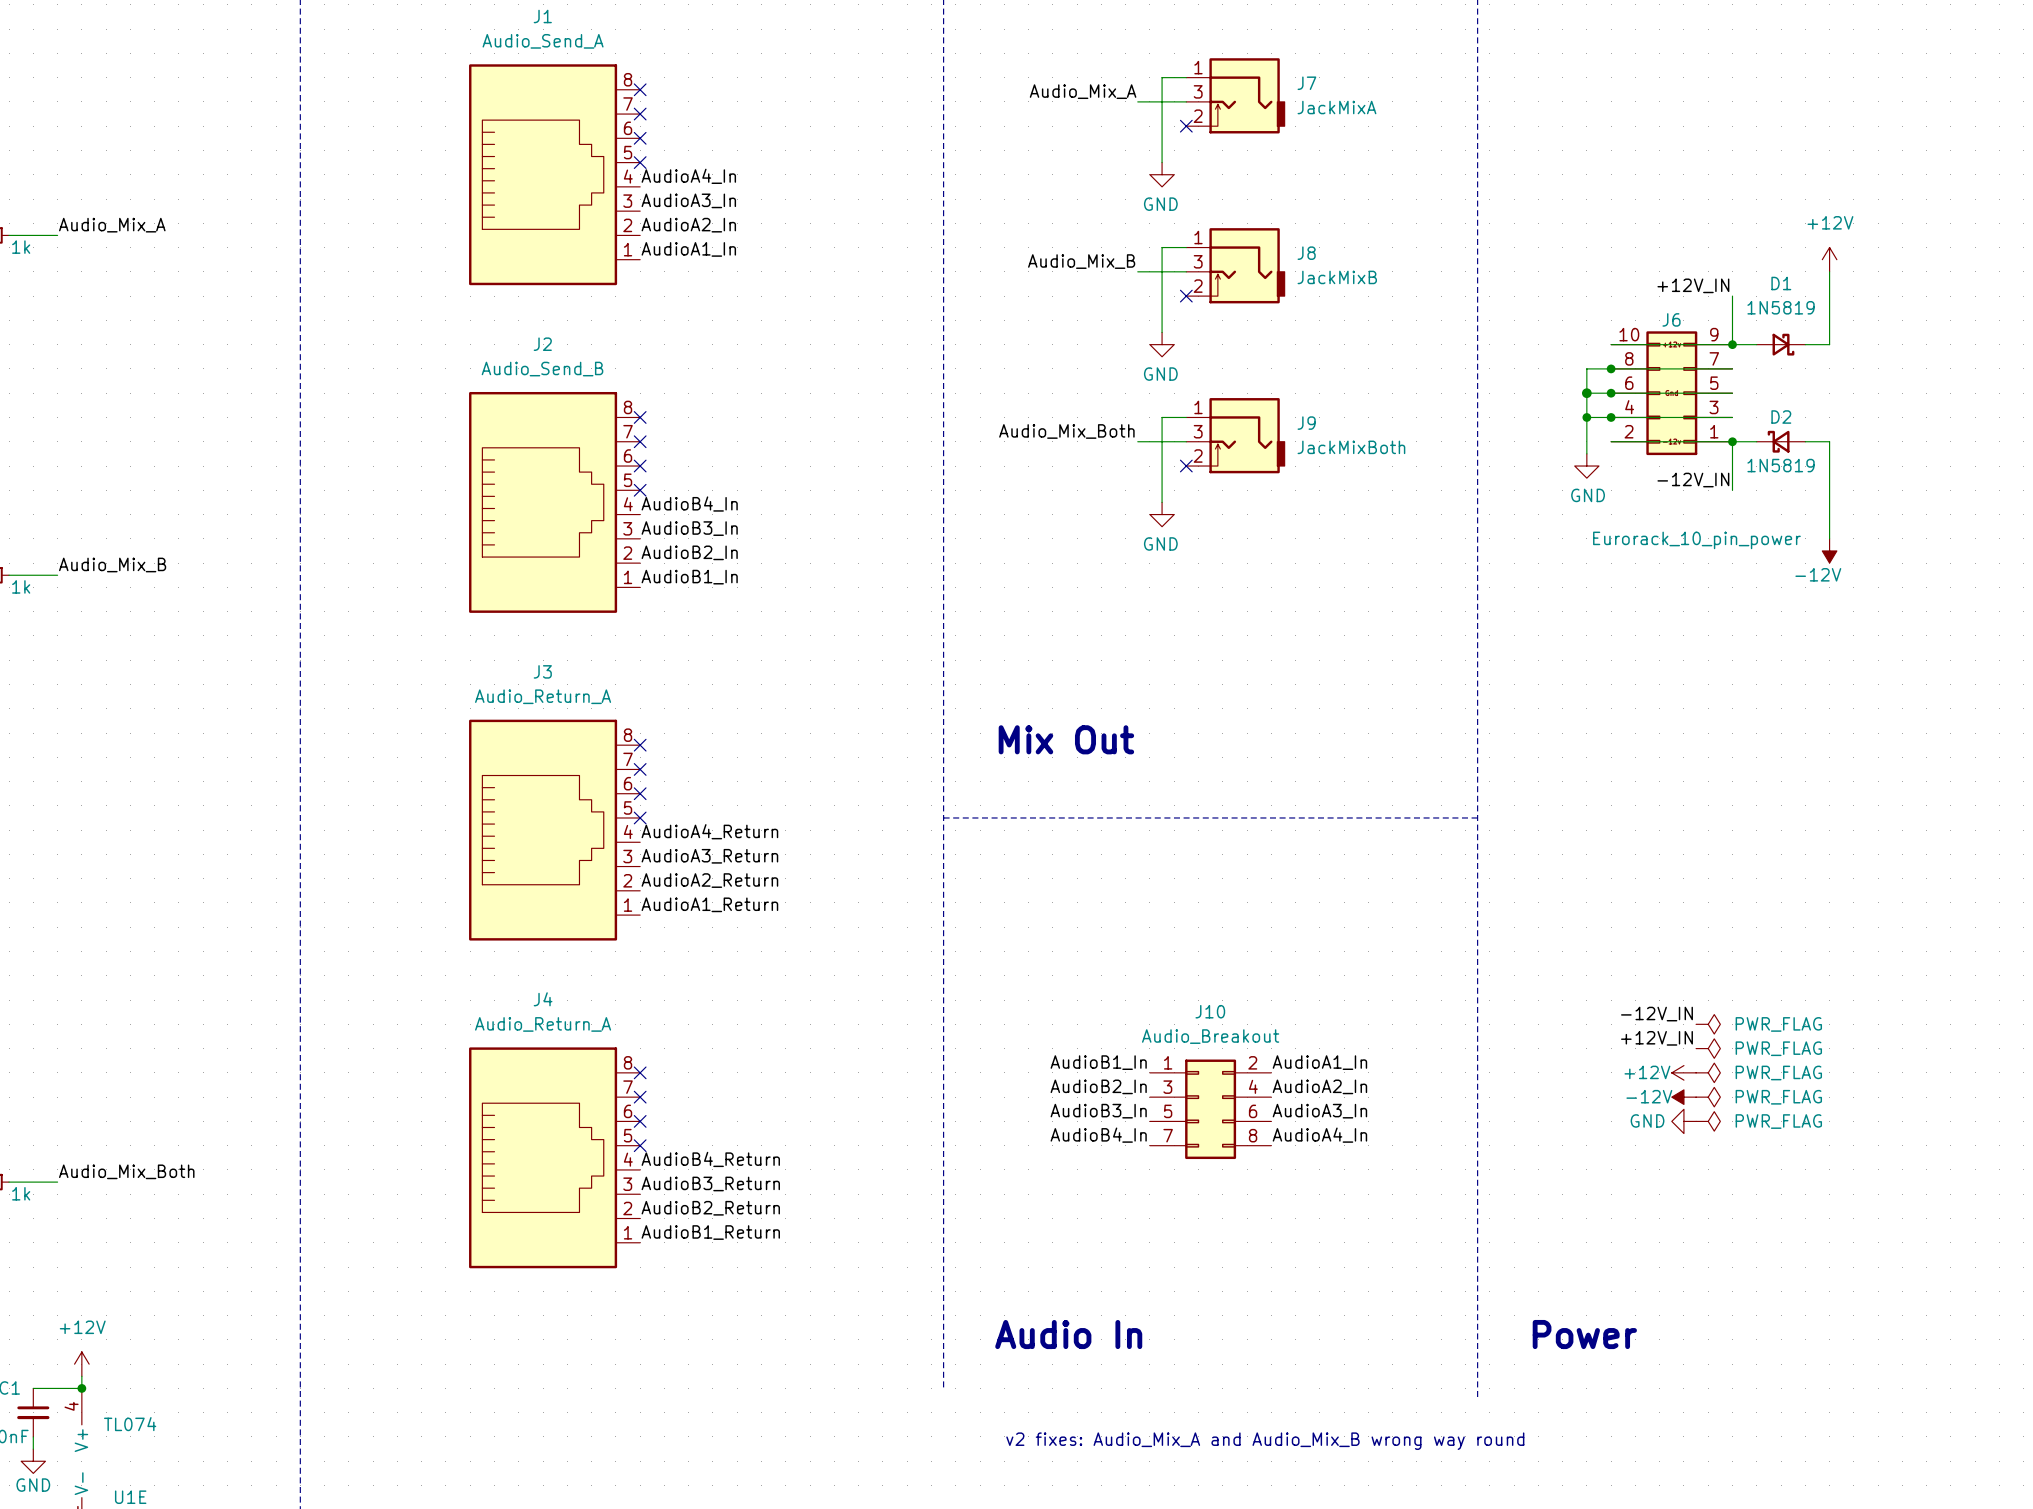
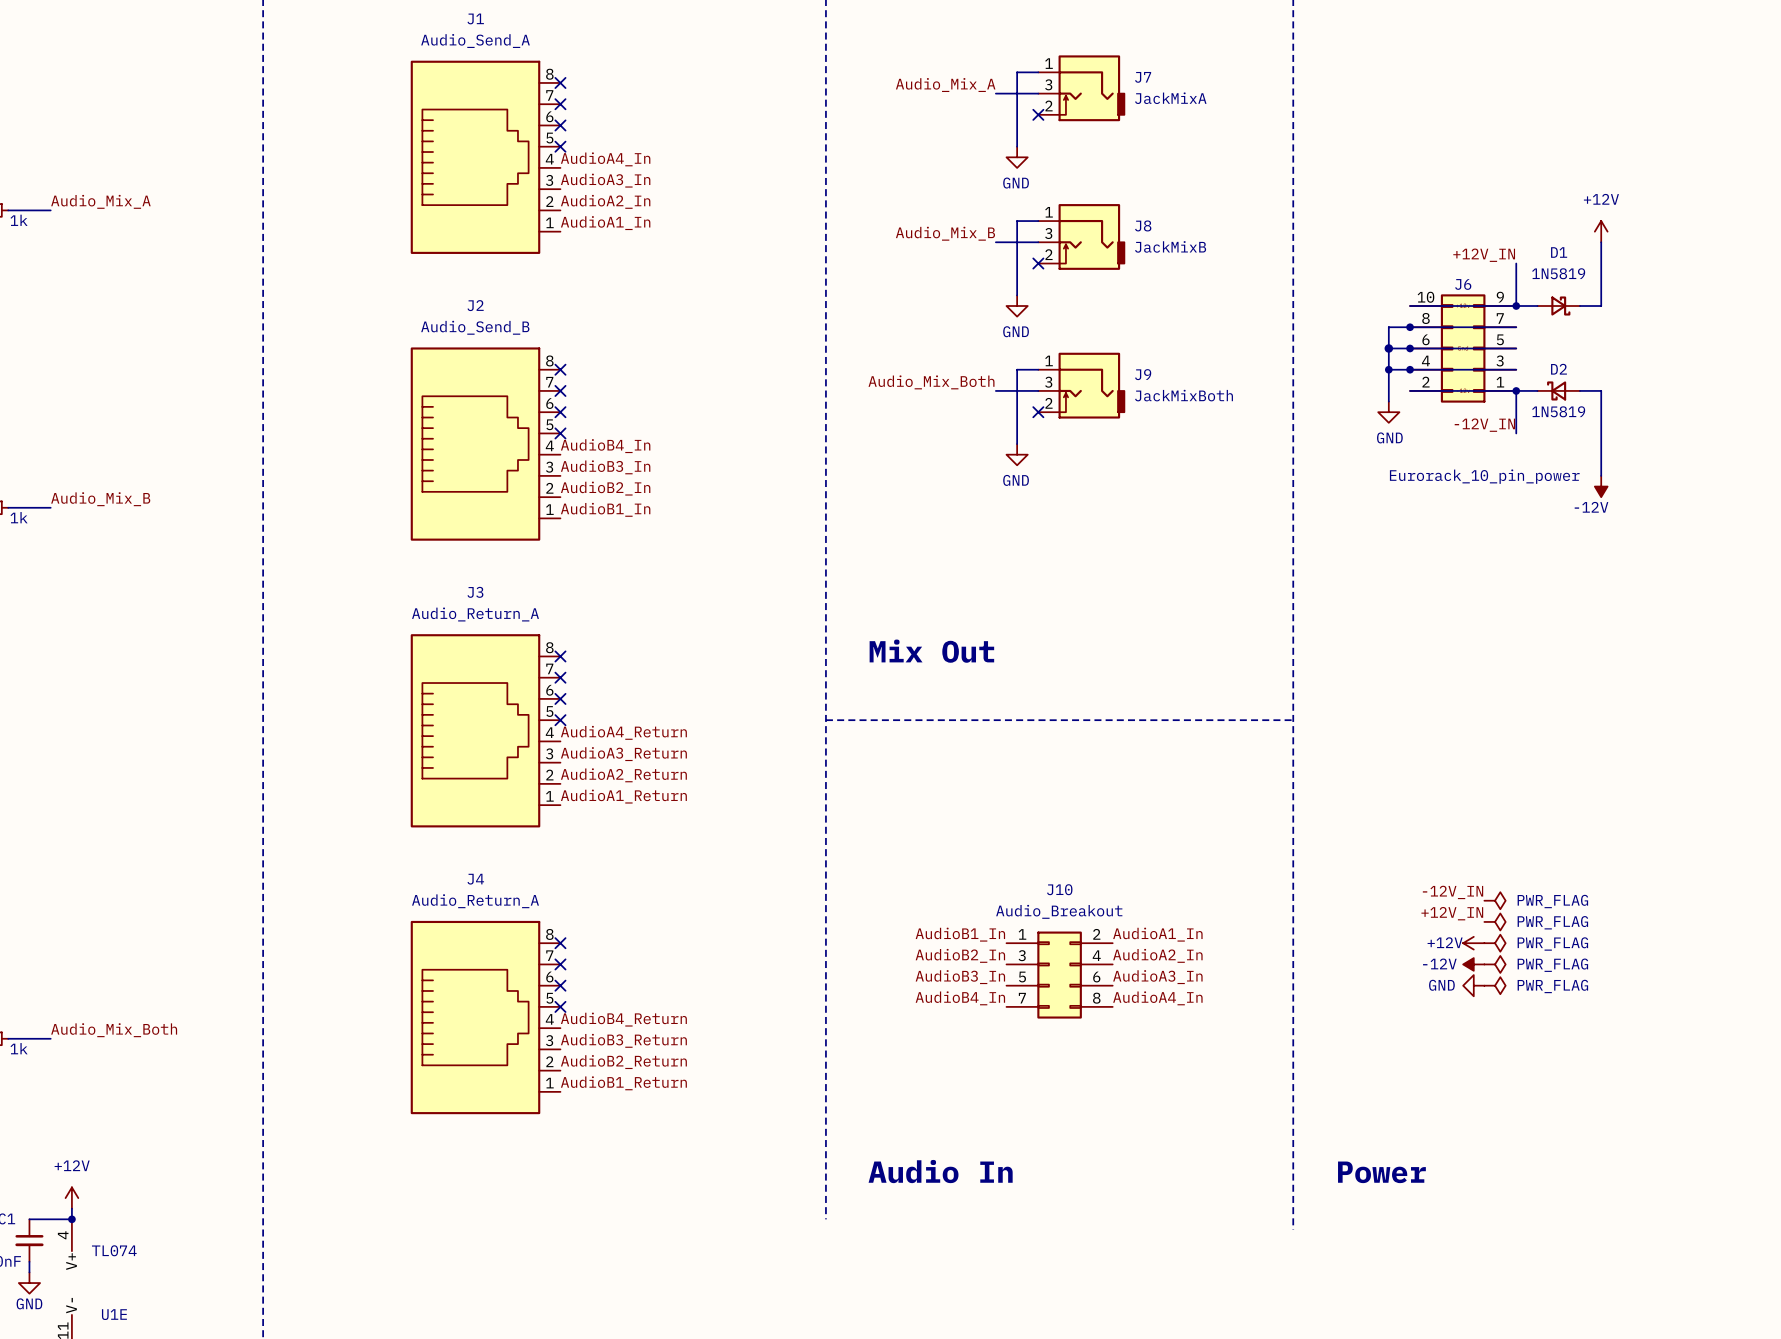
text: v2 fixes: Audio_Mix_A and Audio_Mix_B wrong way round (1265, 1441) -> none

